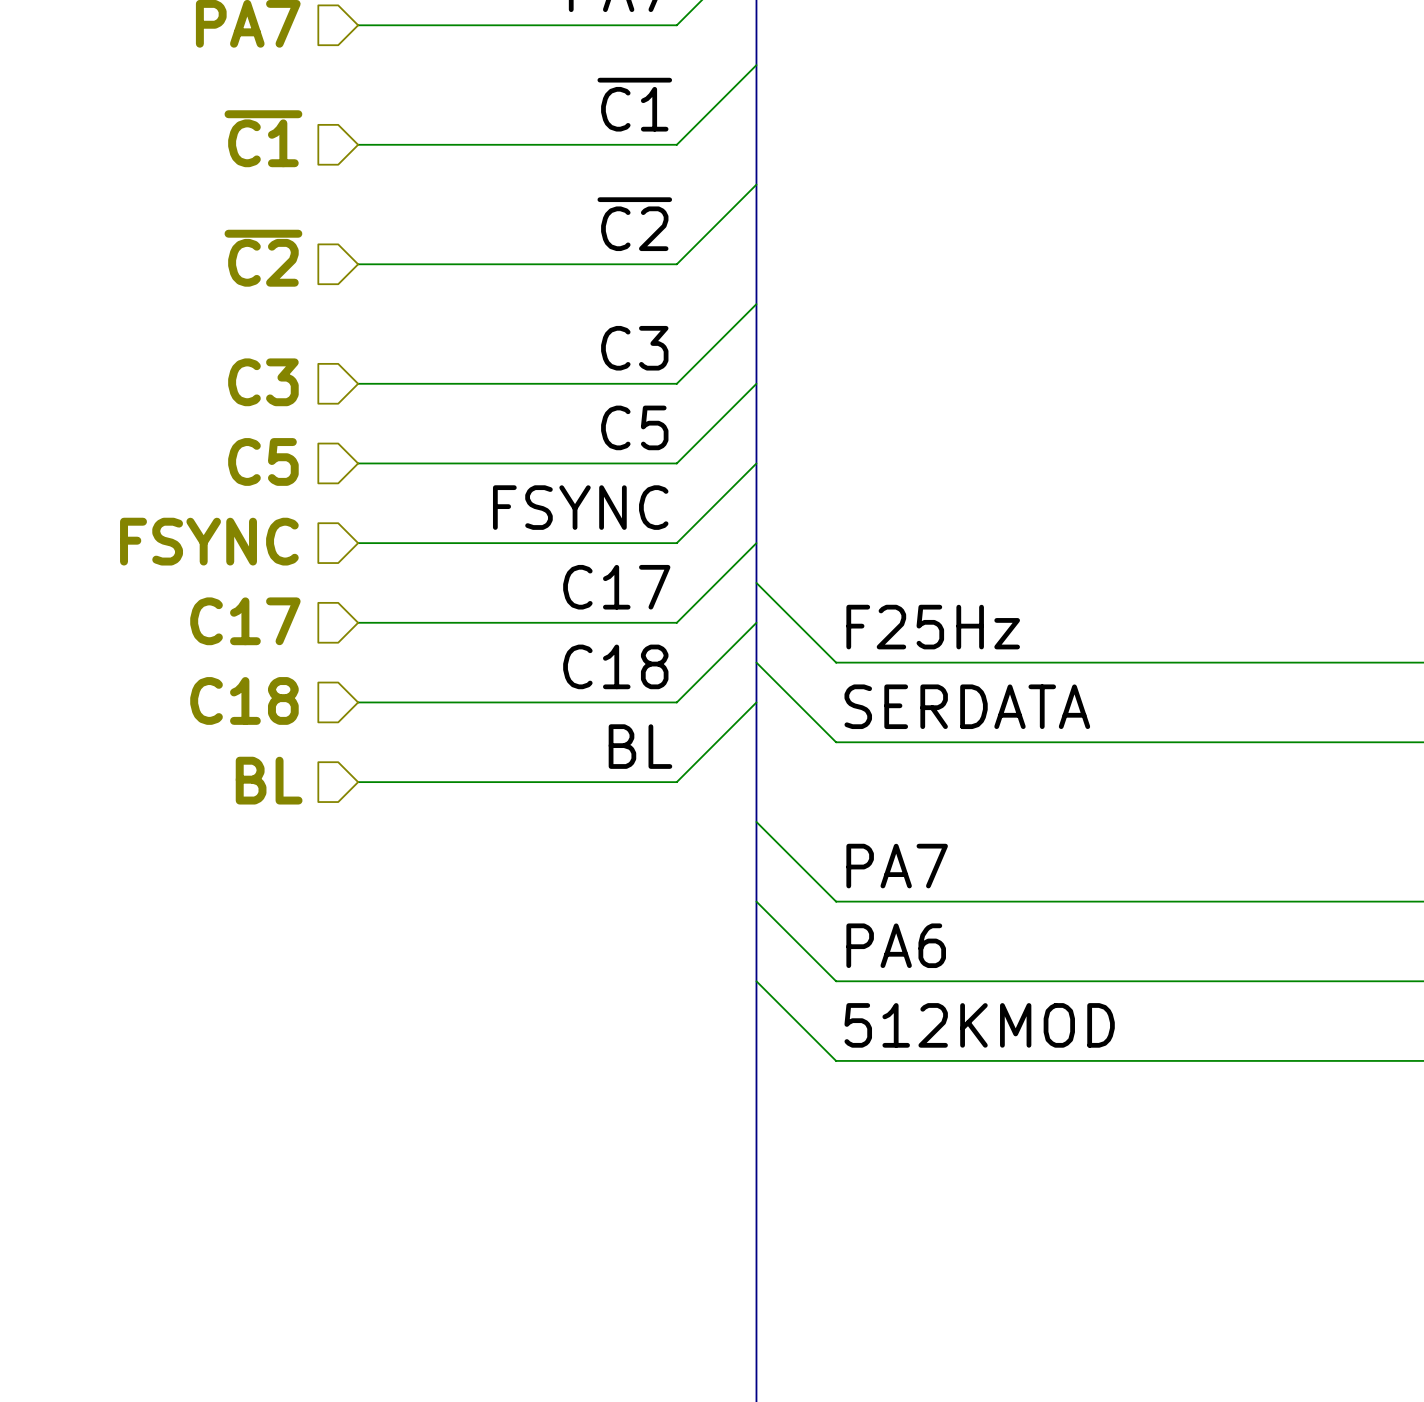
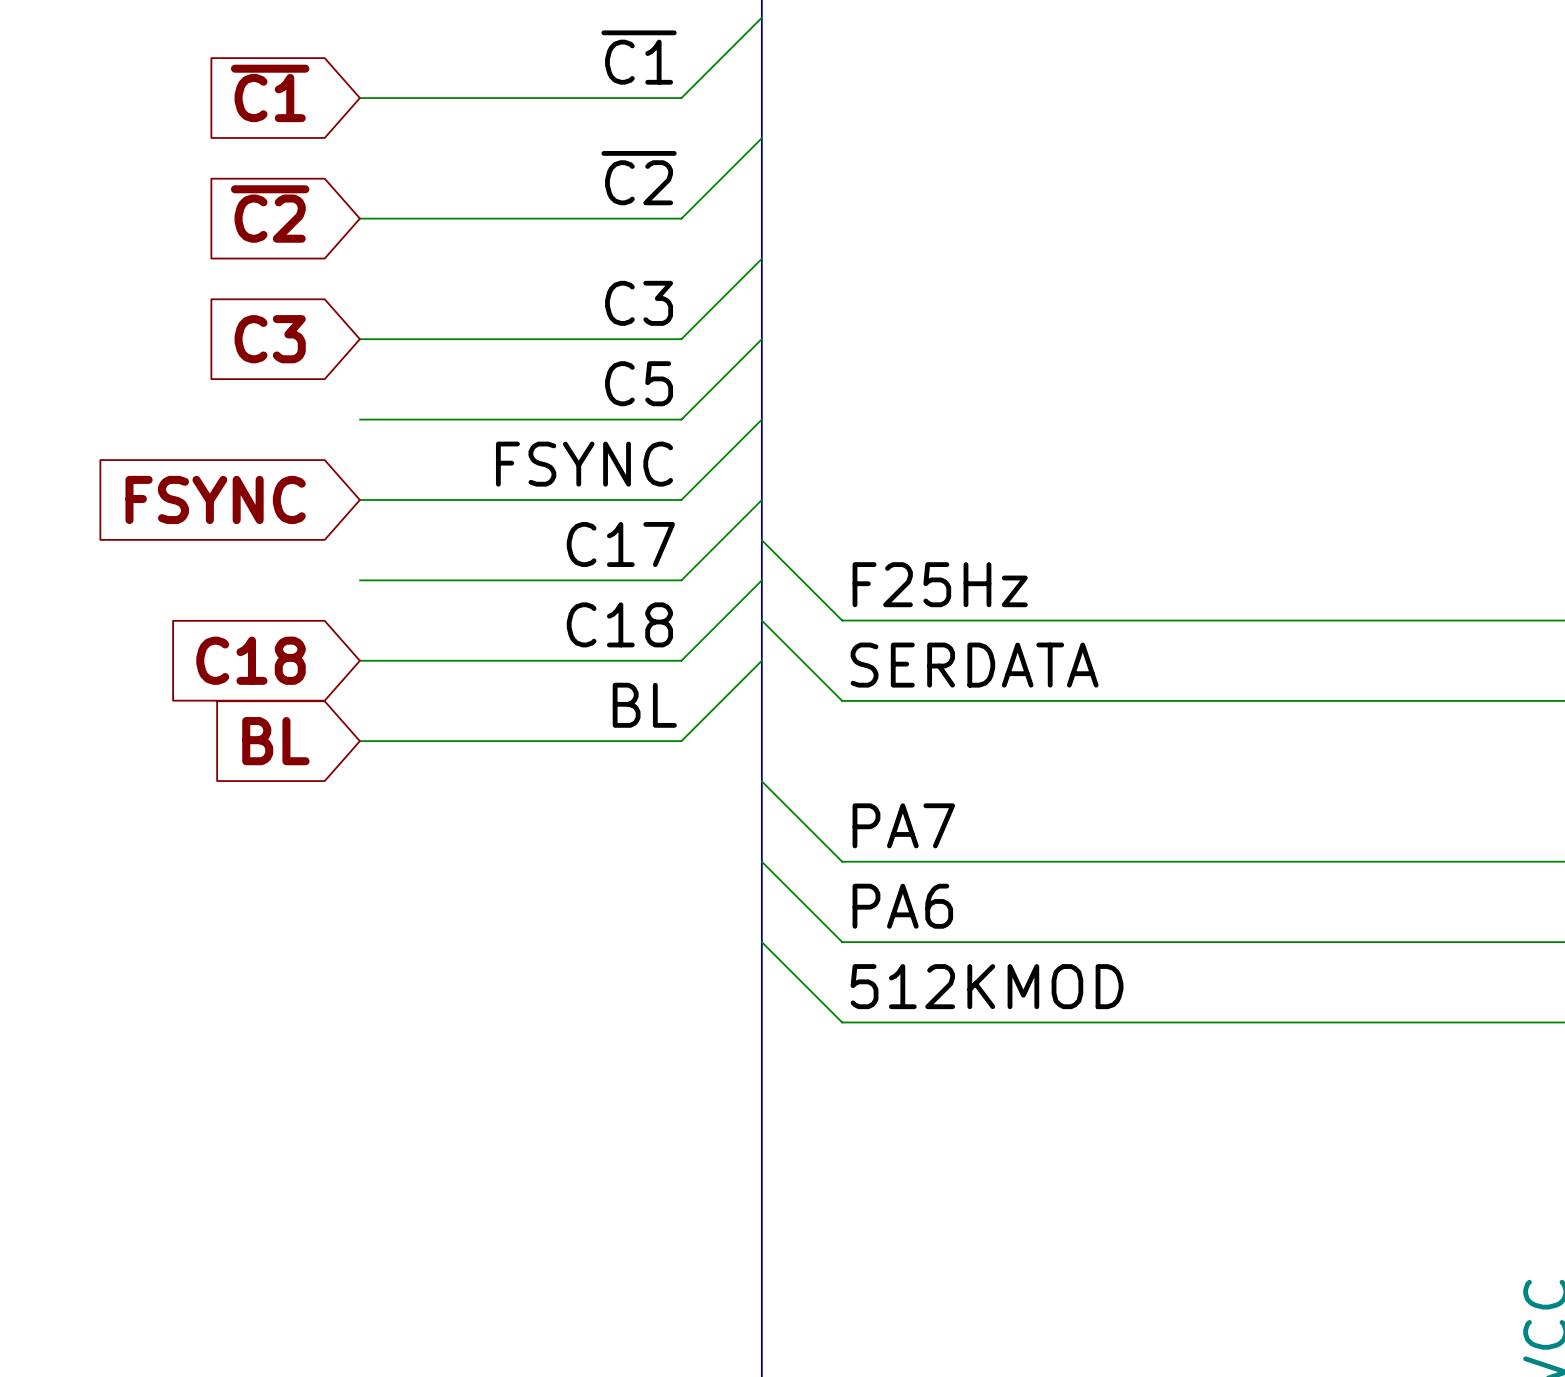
hierarchical label: ~{C1} (263, 138) -> none
global label: none -> ~{C1} (270, 93)
hierarchical label: ~{C2} (263, 258) -> none
global label: none -> ~{C2} (270, 214)
hierarchical label: C3 (263, 382) -> none
global label: none -> C3 (270, 339)
hierarchical label: C5 (263, 461) -> none
hierarchical label: FSYNC (209, 541) -> none
global label: none -> FSYNC (215, 499)
hierarchical label: C17 (245, 621) -> none
hierarchical label: C18 (244, 700) -> none
global label: none -> C18 (251, 660)
hierarchical label: BL (269, 780) -> none
global label: none -> BL (275, 741)

